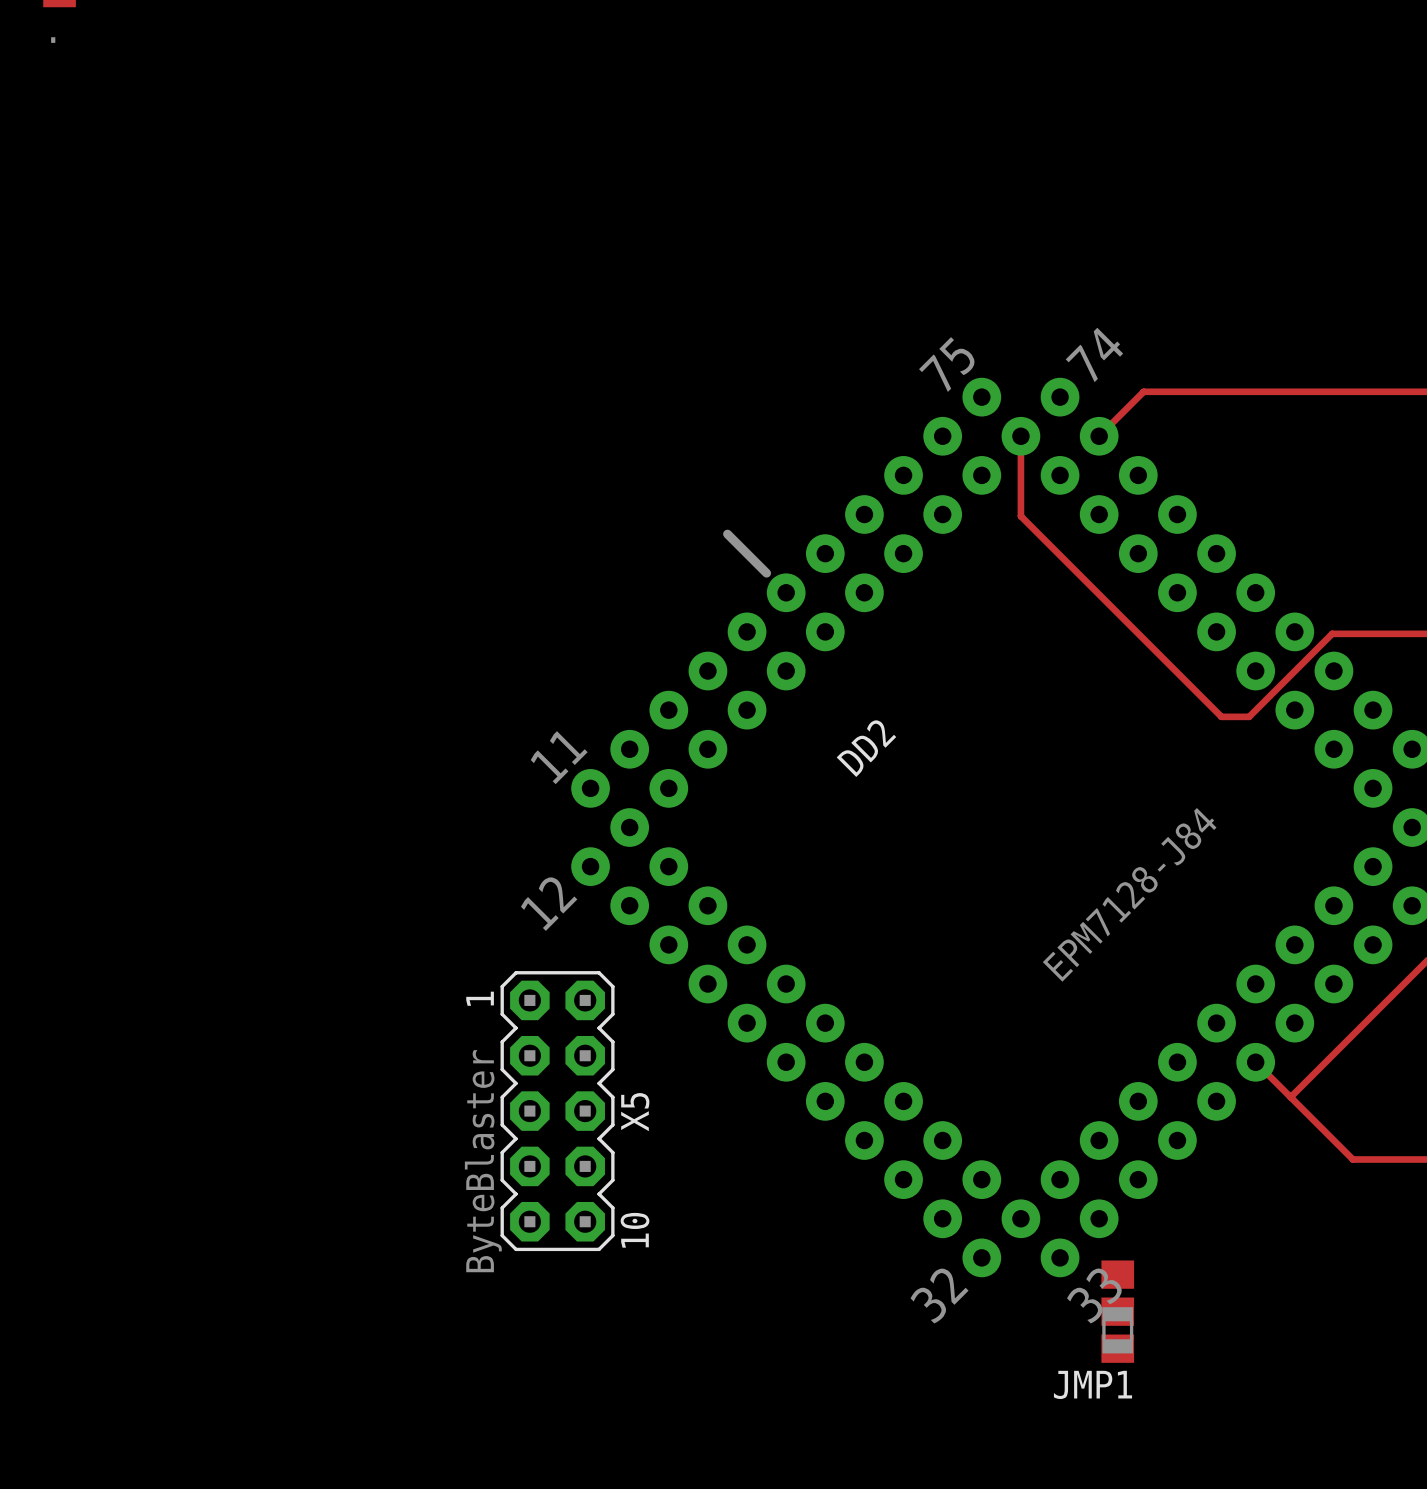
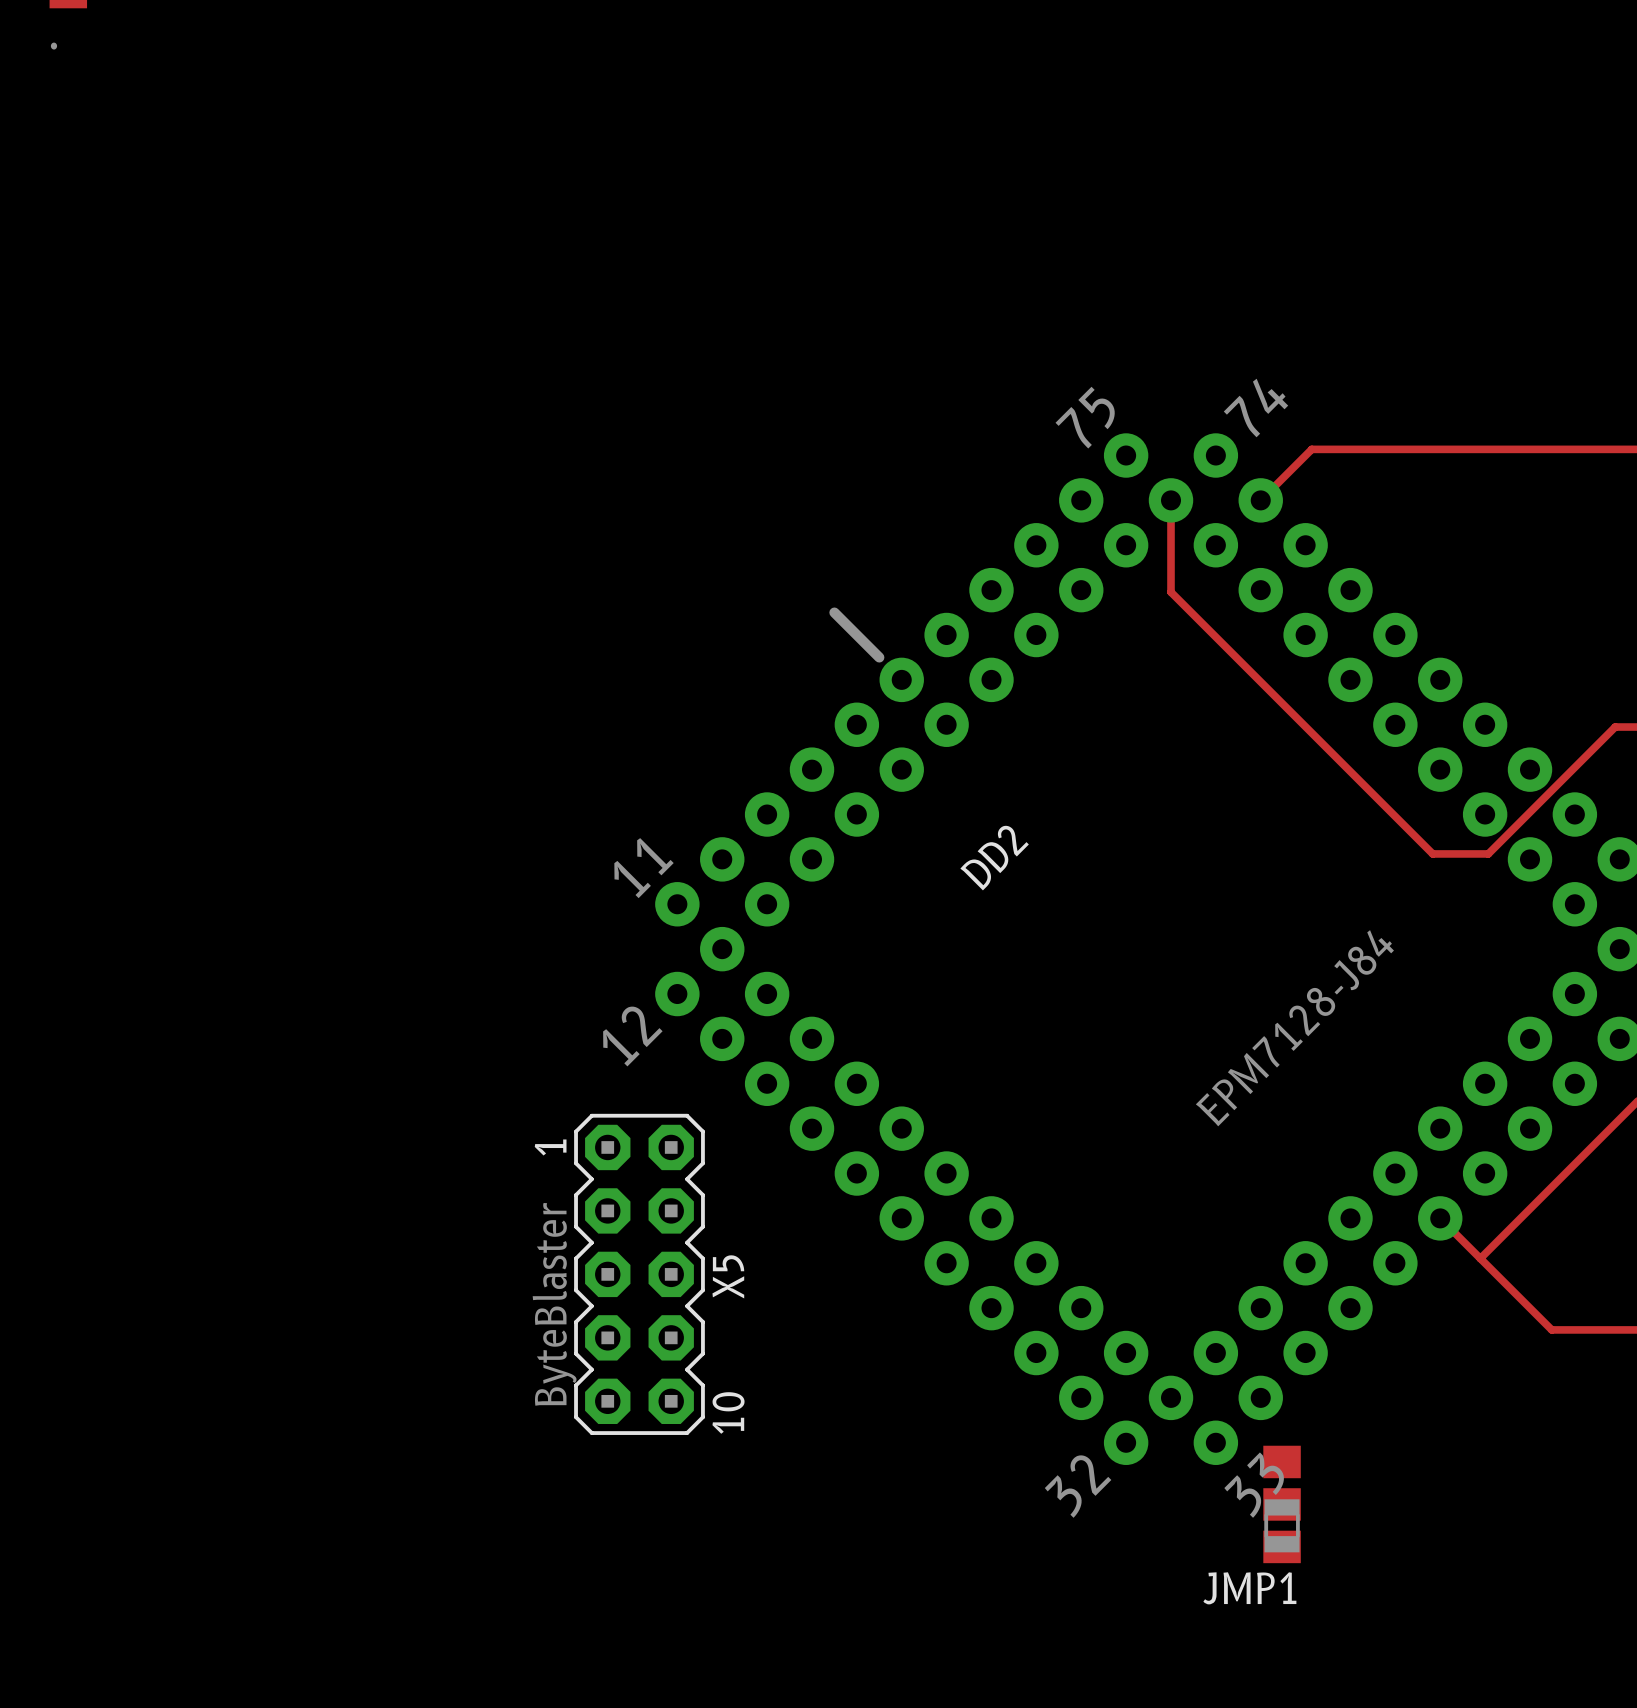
track: (1408, 633) (1332, 633) (1249, 716) (1221, 716) -> (1615, 727) (1488, 853) (1432, 853) (1401, 822)

